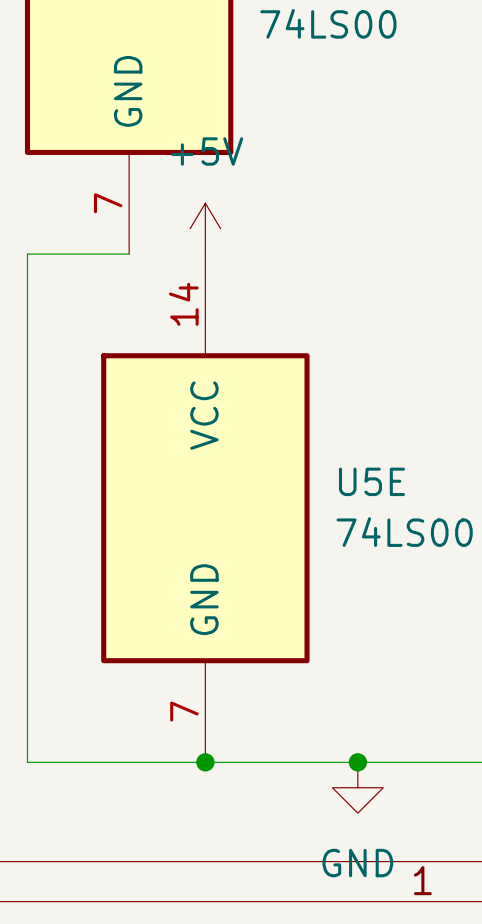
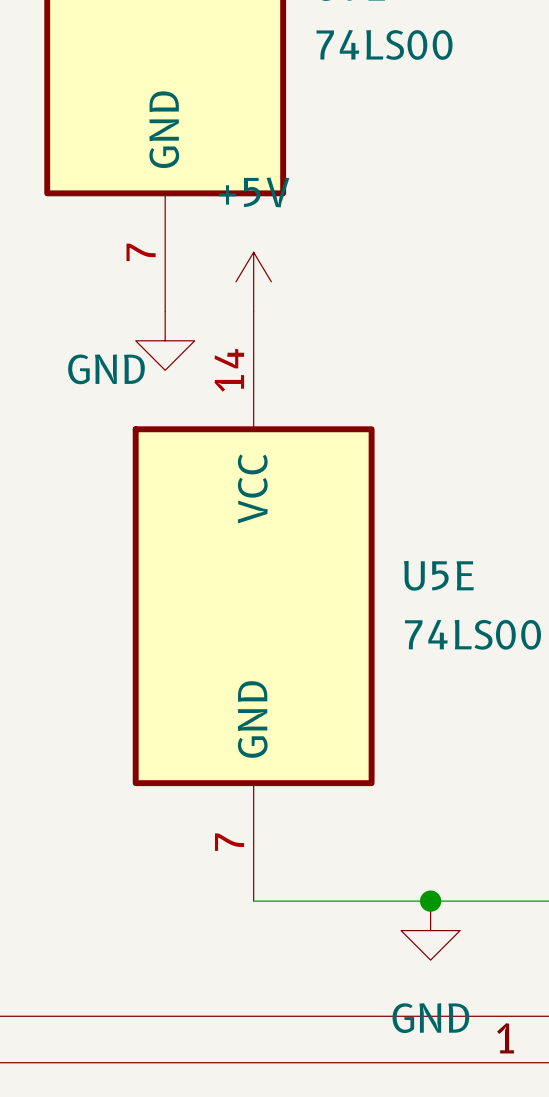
wire: (129, 254) (27, 254) (27, 762) (205, 762) -> none
power symbol: none -> GND (165, 340)
junction: (205, 762) -> none

